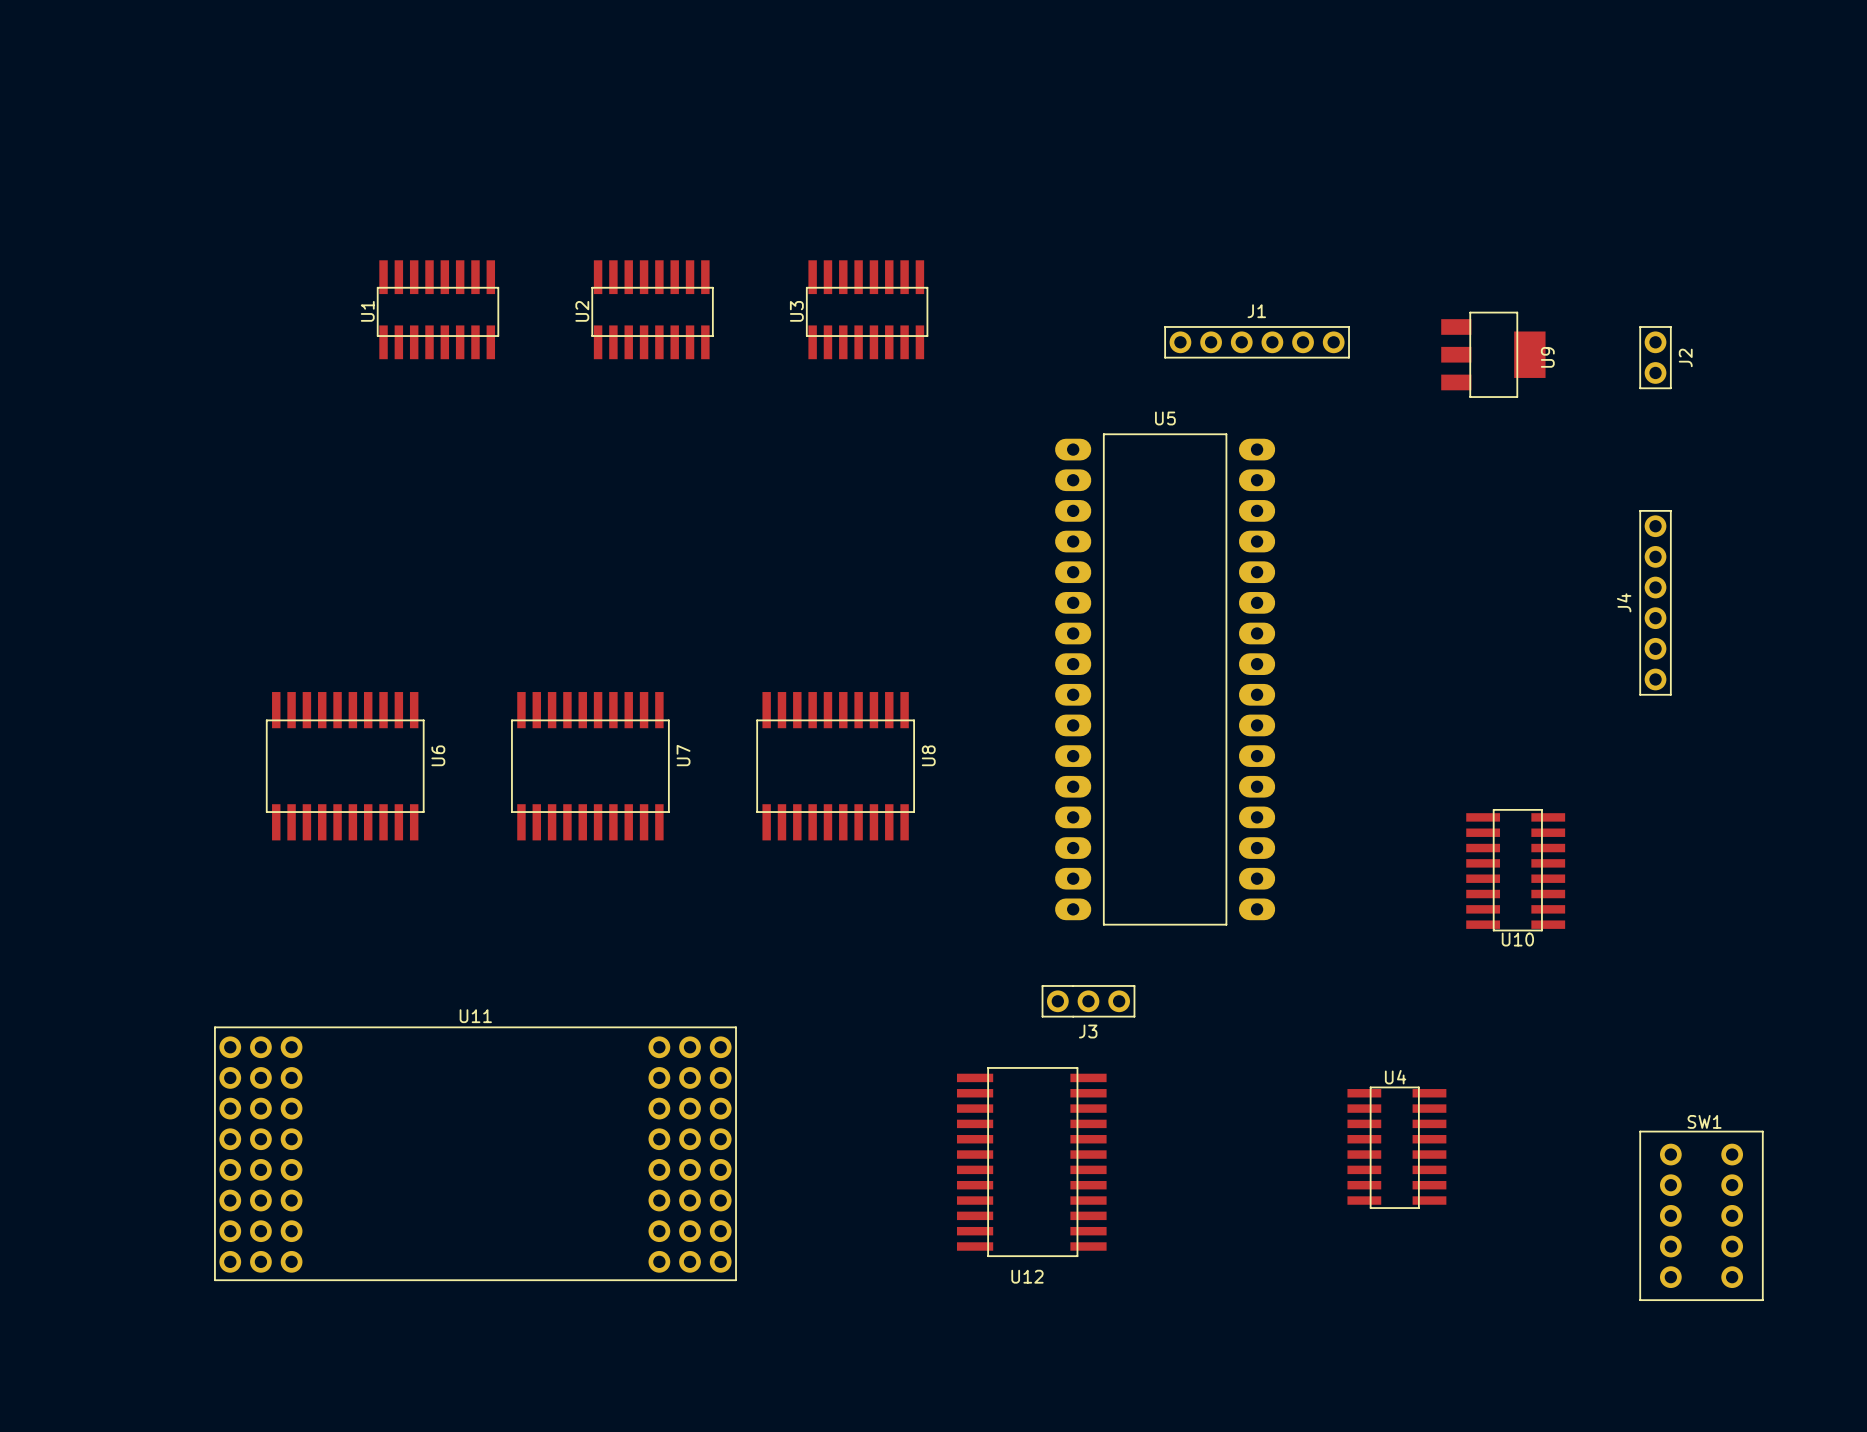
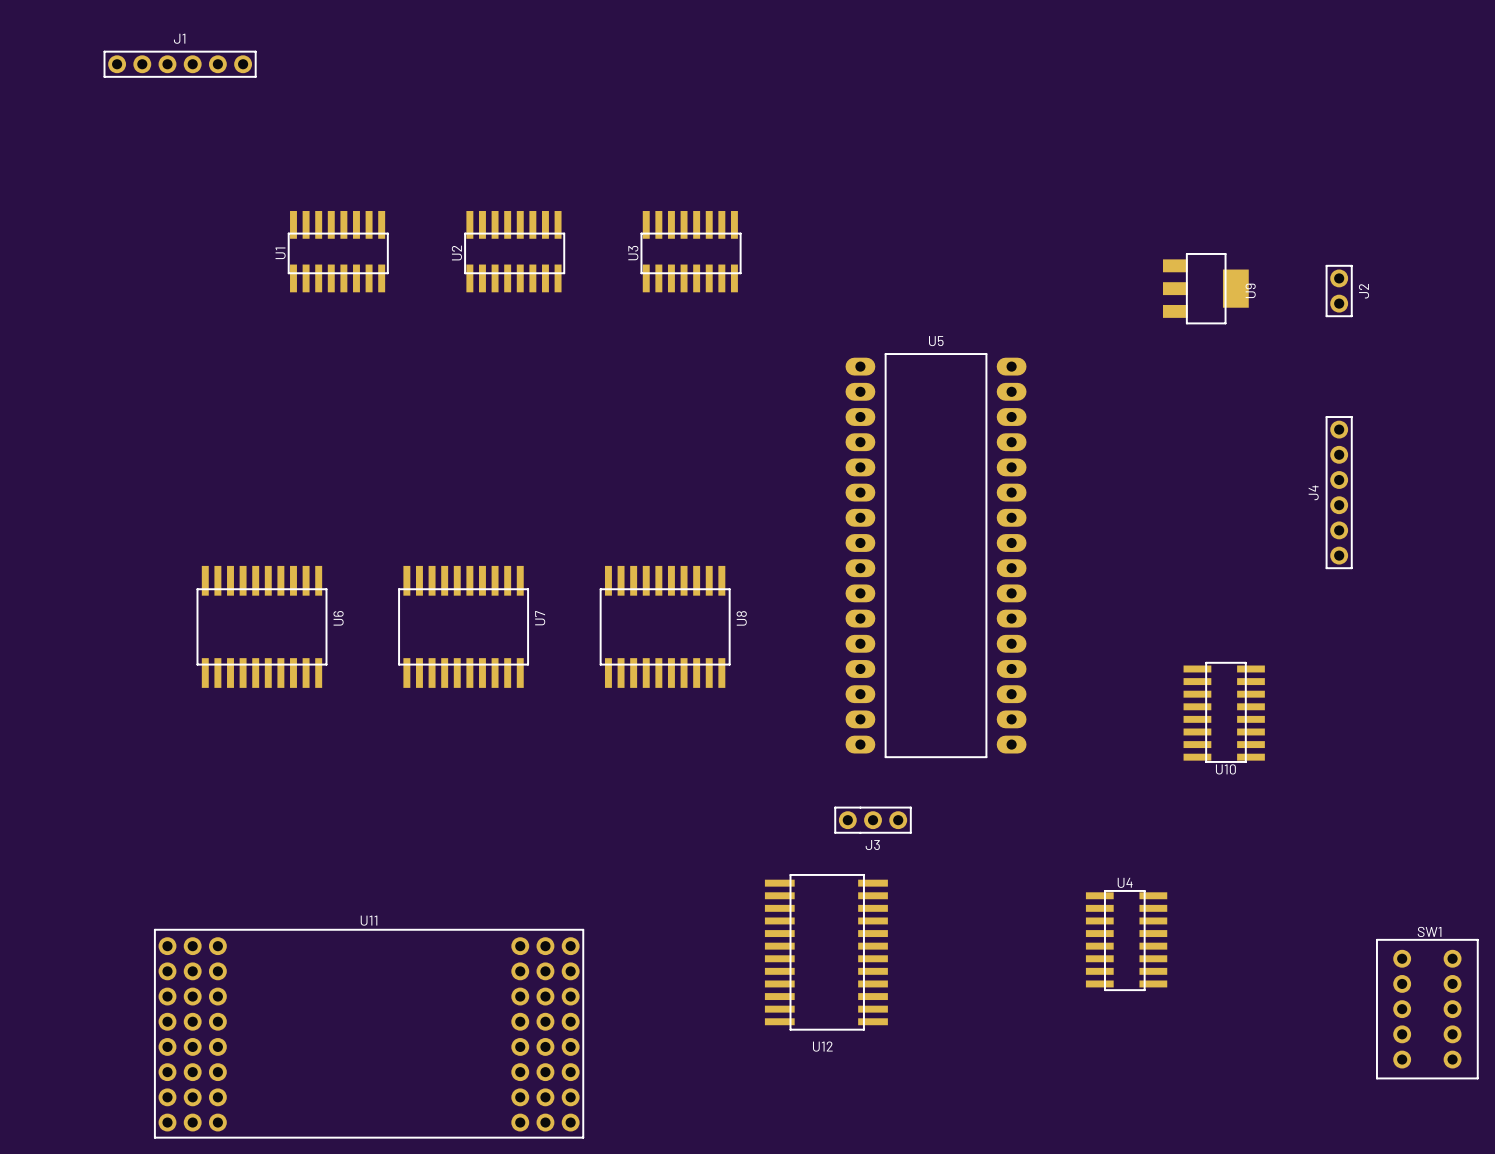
J1 position: (1257, 342) -> (180, 64)
U11 position: (475, 1153) -> (369, 1033)
SW1 position: (1701, 1215) -> (1427, 1009)

